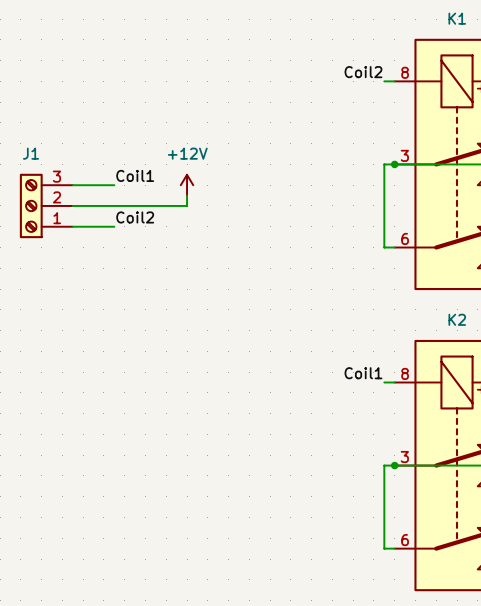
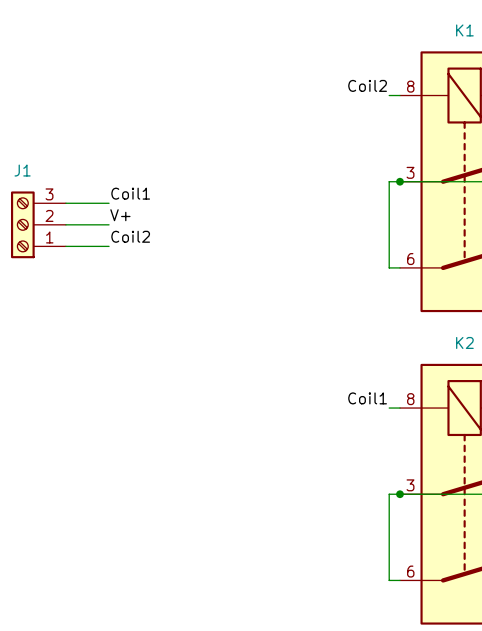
power symbol: +12V (187, 185) -> none
wire: (187, 195) (187, 205) (114, 205) -> none
label: none -> V+ (120, 215)

